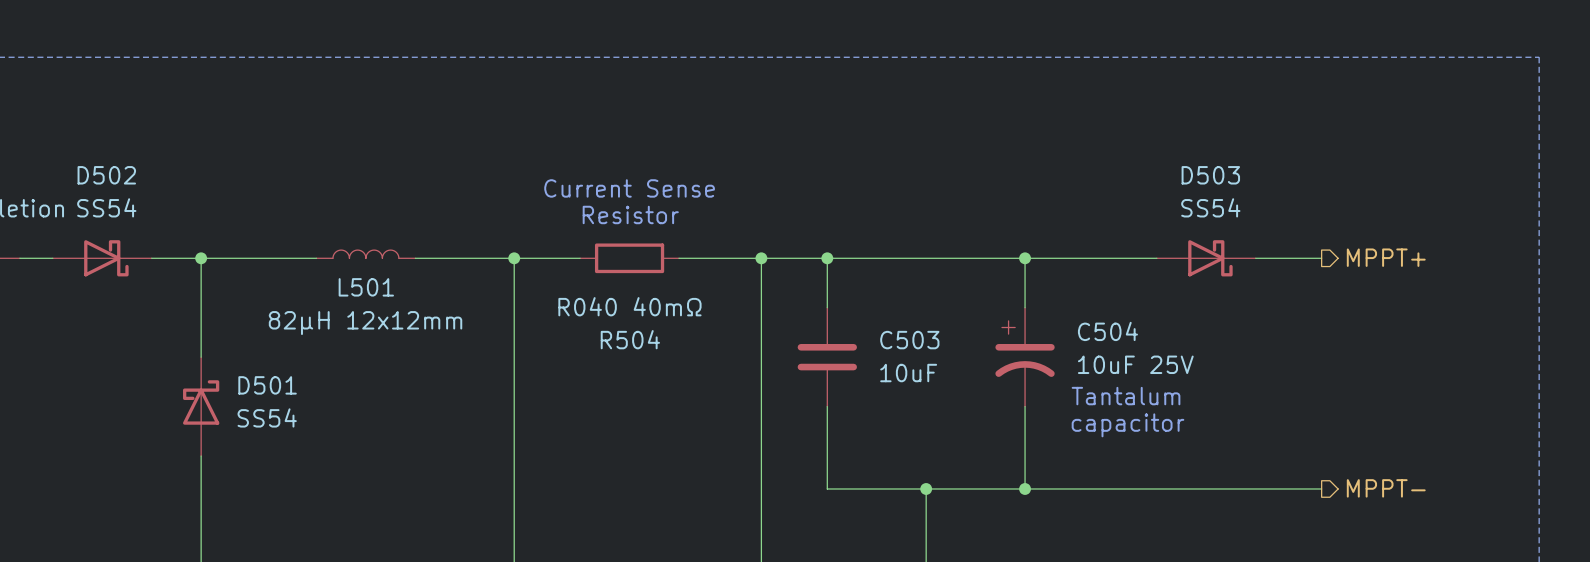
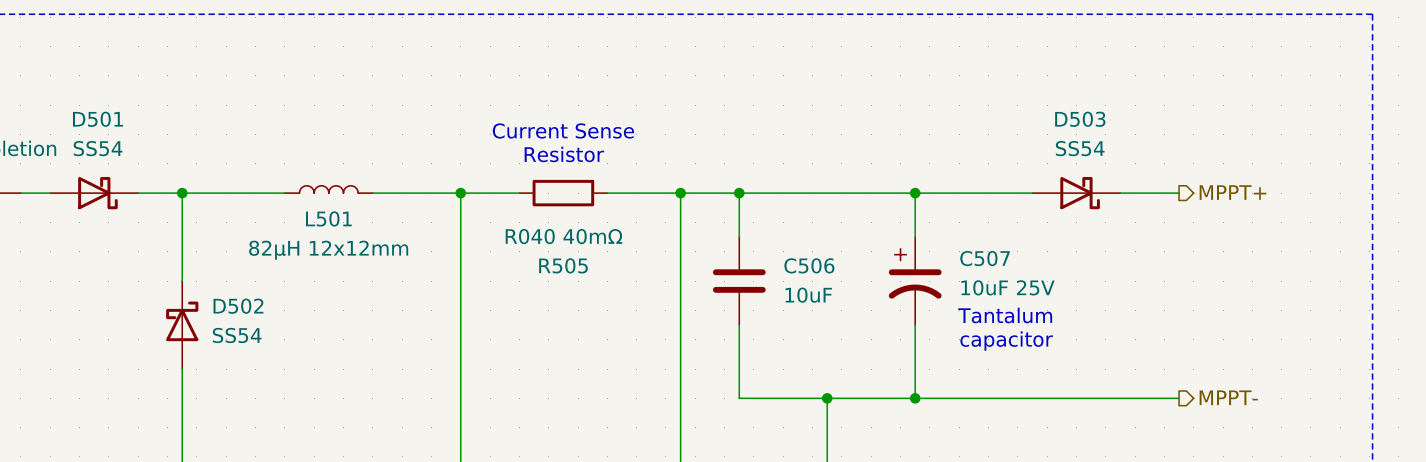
D502 name: D502 (106, 175) -> D501 (98, 119)
C504 name: C504 (1107, 331) -> C507 (985, 258)
R504 name: R504 (630, 339) -> R505 (563, 265)
C503 name: C503 (909, 340) -> C506 (809, 265)
D501 name: D501 (267, 385) -> D502 (238, 306)

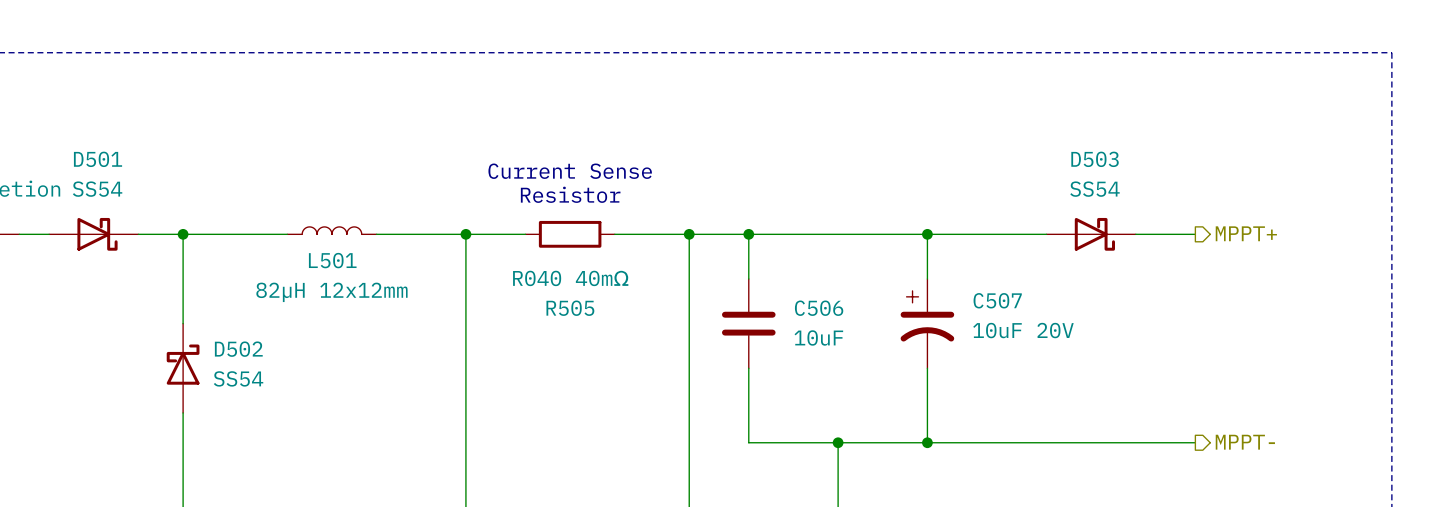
C507 value: 10uF 25V (1008, 287) -> 10uF 20V (1023, 330)
text: Tantalum (1005, 315) -> none
text: capacitor (1006, 341) -> none

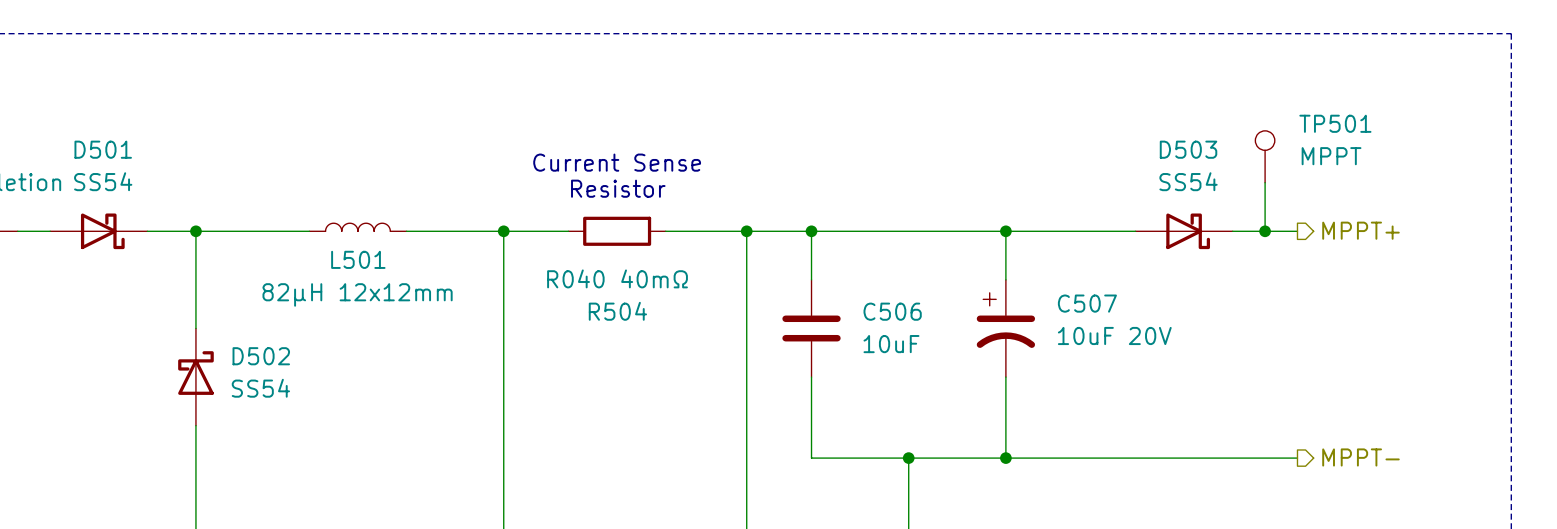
TP501: none -> MPPT (1265, 156)
wire: none -> (1265, 182) (1265, 231)
junction: none -> (1265, 231)
R505 name: R505 (570, 308) -> R504 (617, 311)

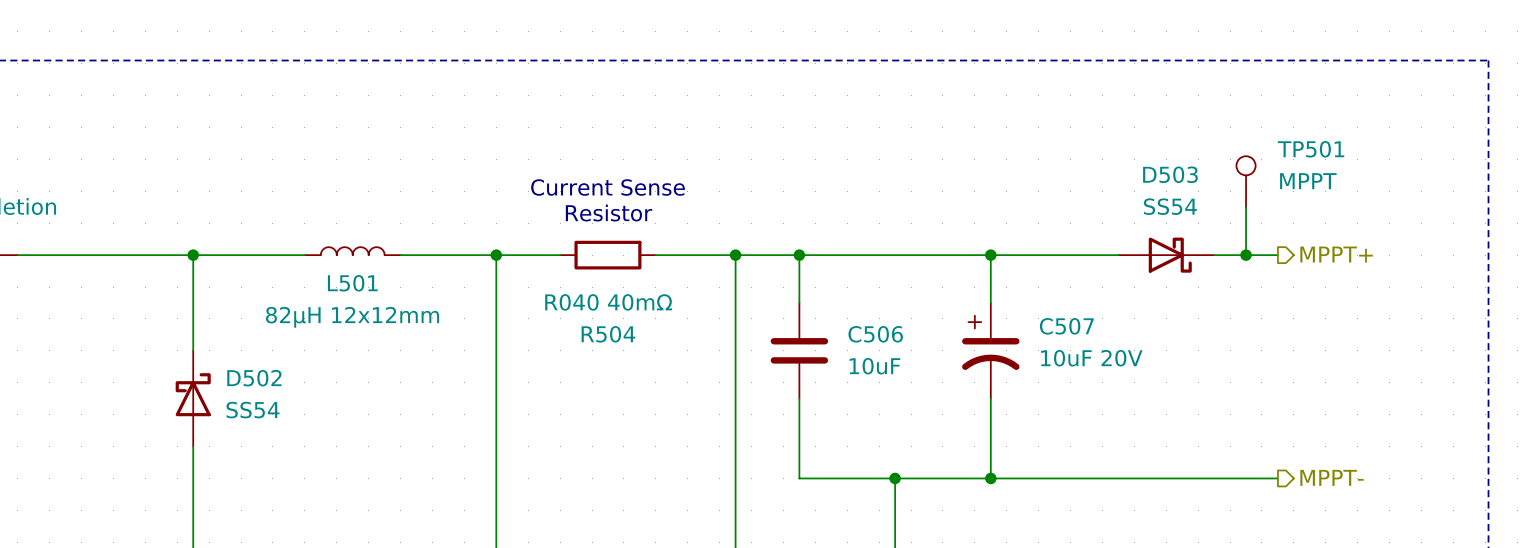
D501: SS54 (98, 231) -> none

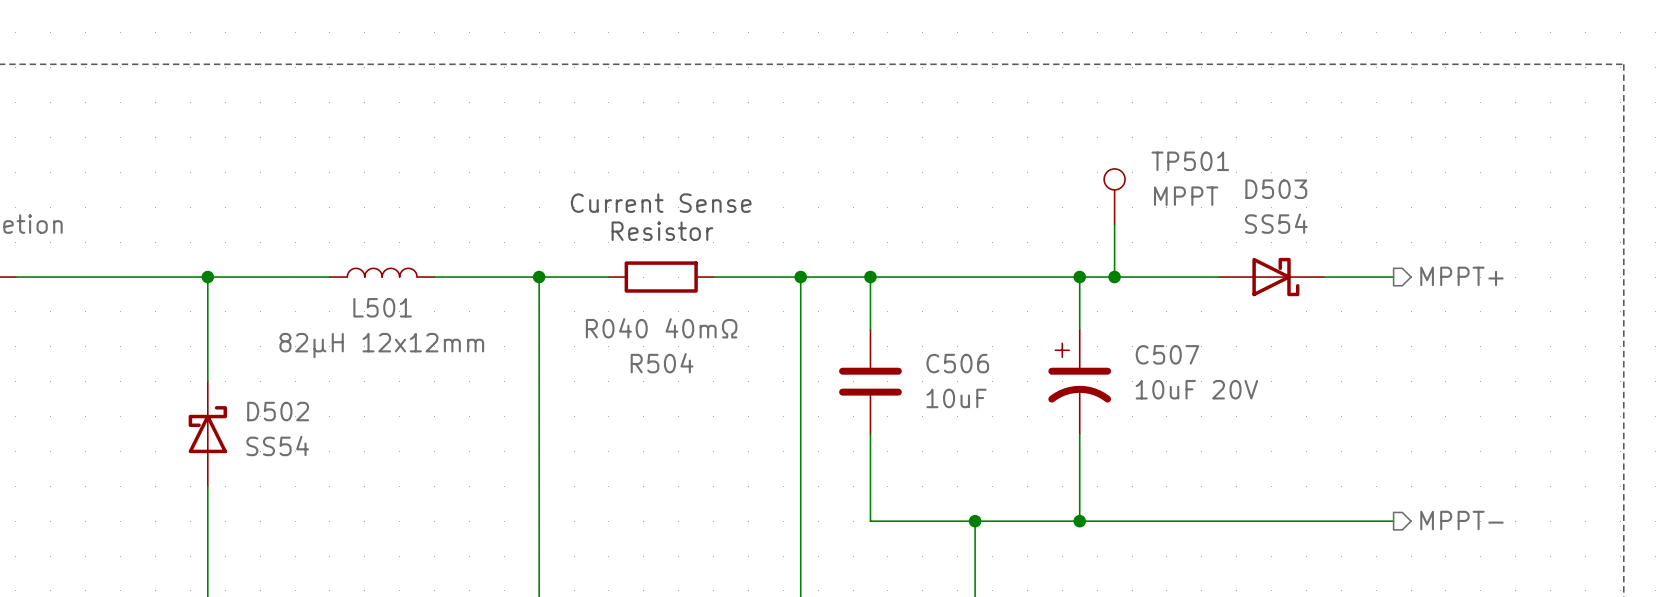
TP501 position: (1246, 181) -> (1114, 196)
wire: (1246, 207) (1246, 255) -> (1114, 224) (1114, 277)
junction: none -> (1114, 277)
junction: (1246, 255) -> none

